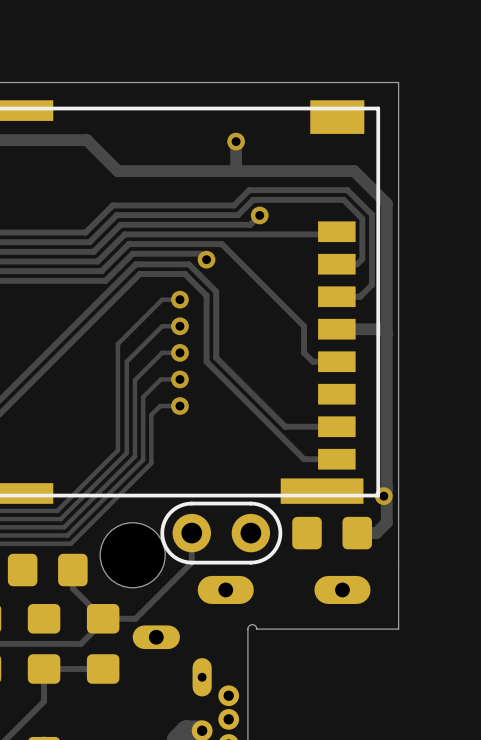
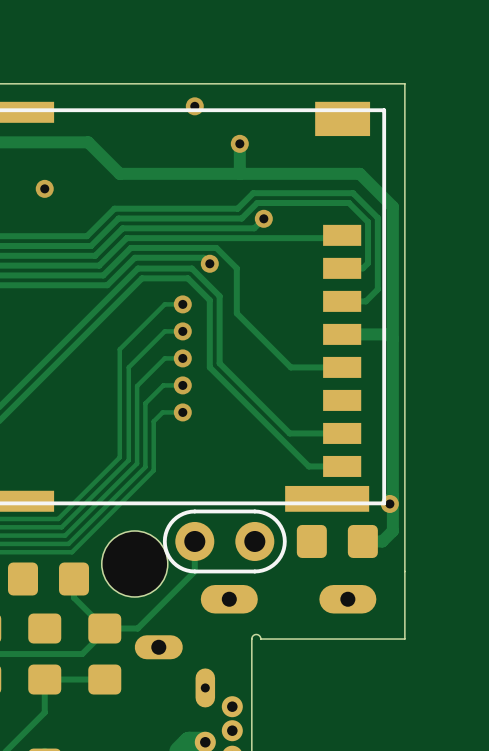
via: none -> (194, 106)
via: none -> (44, 188)
track: (213, 244) (221, 244) (304, 326) (304, 352) (312, 361) -> (216, 247) (236, 268) (236, 313) (290, 367) (317, 367)

